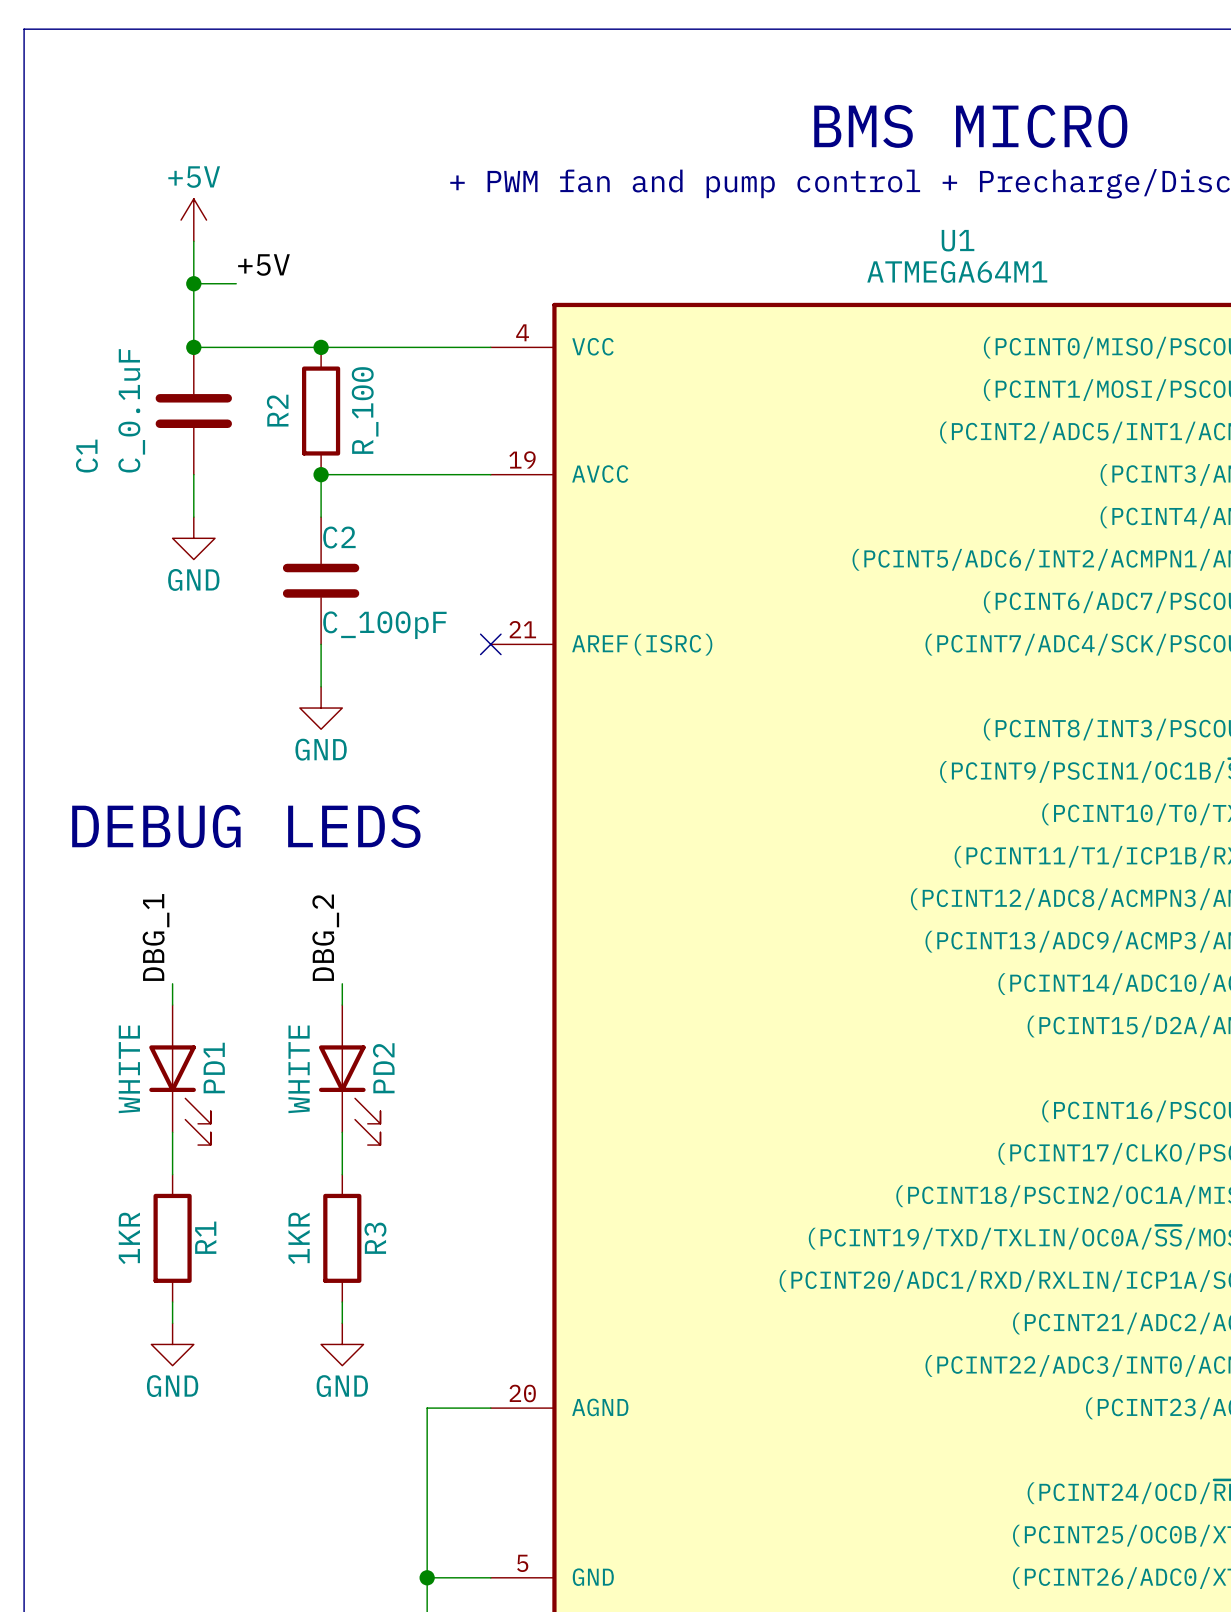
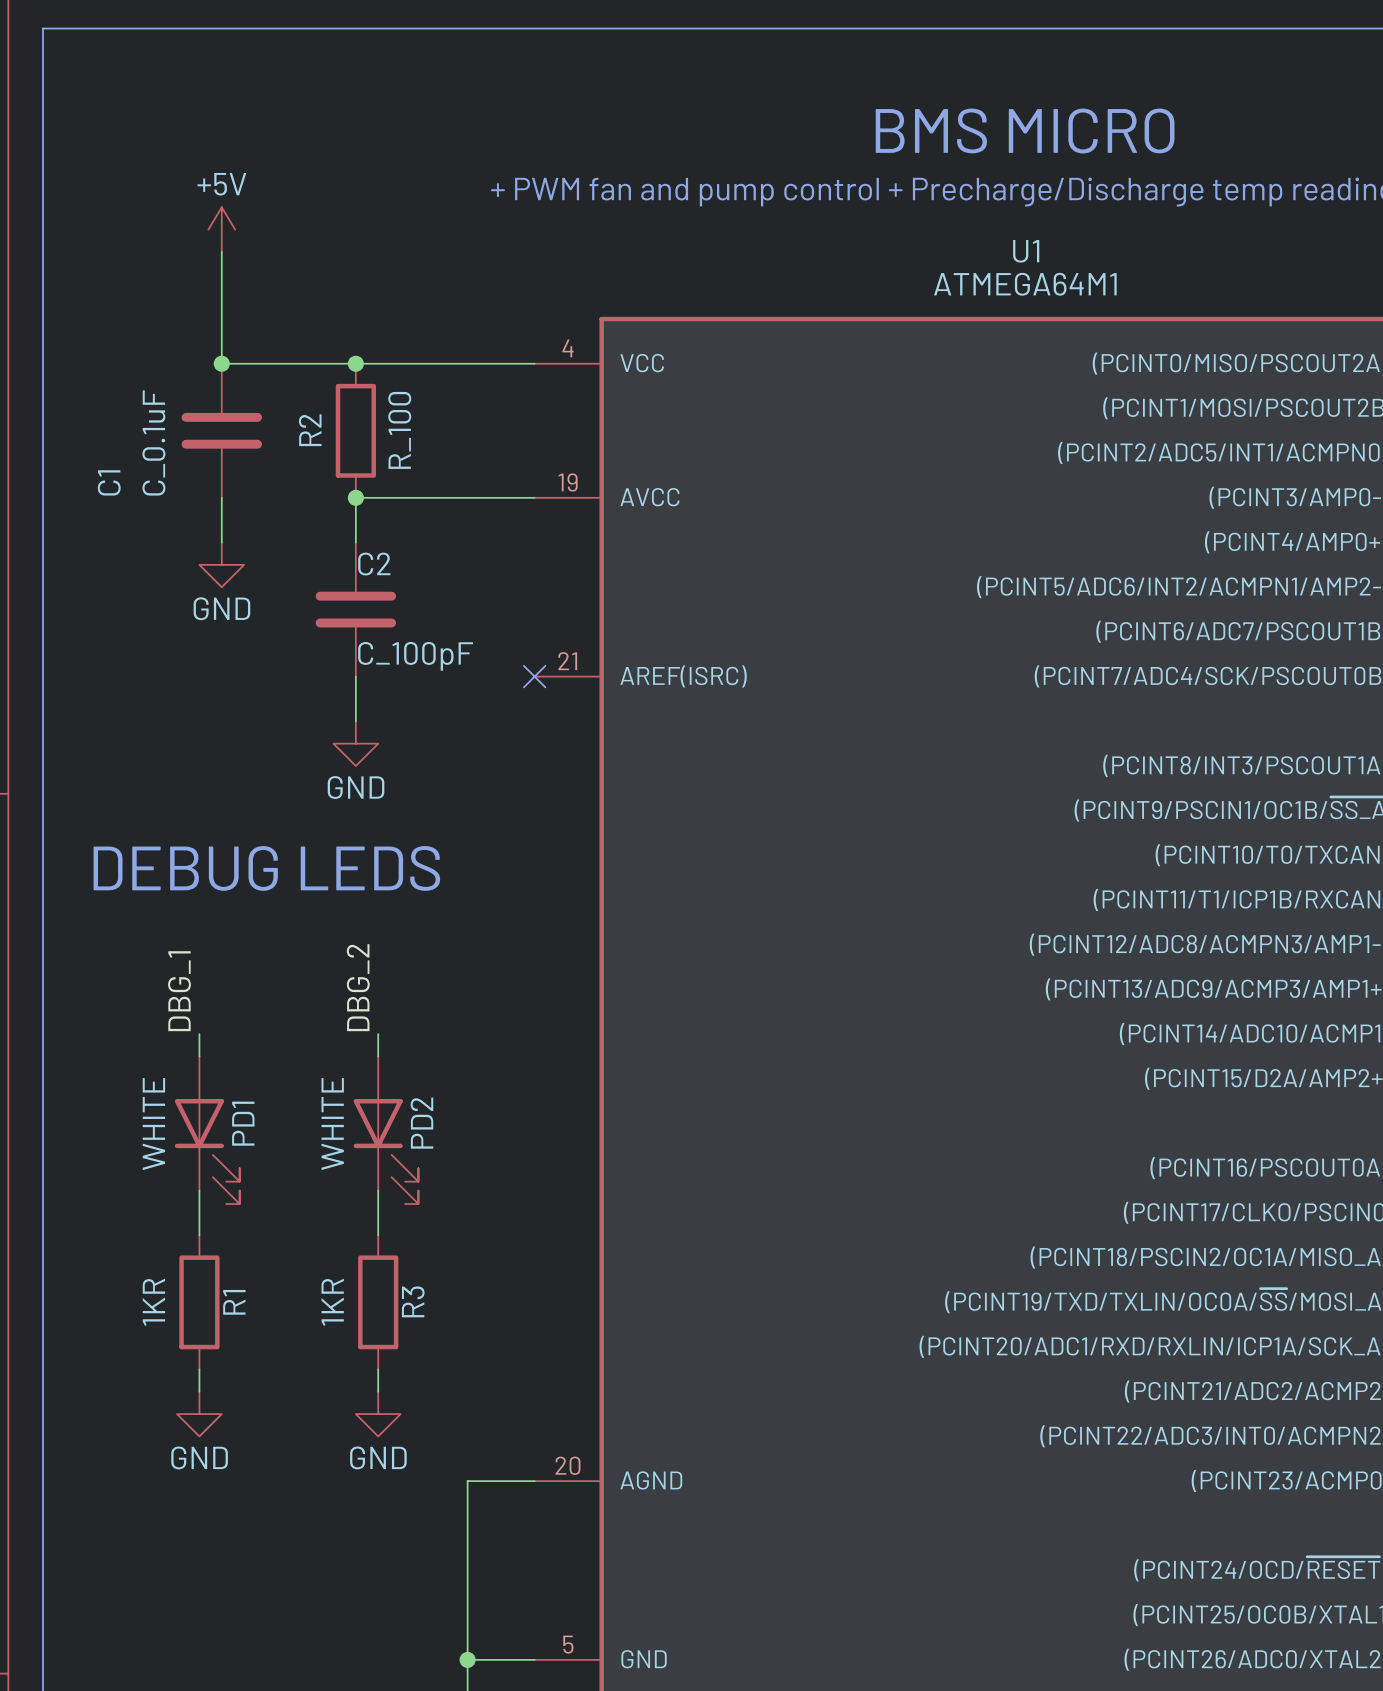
label: +5V (263, 264) -> none
wire: (193, 283) (236, 283) -> none
junction: (193, 283) -> none

